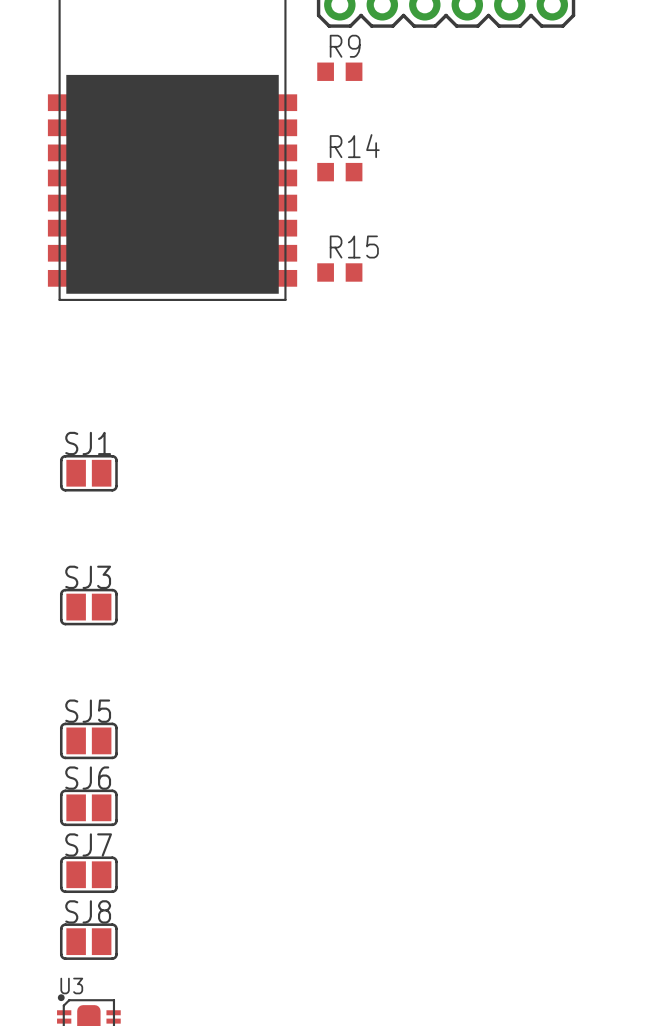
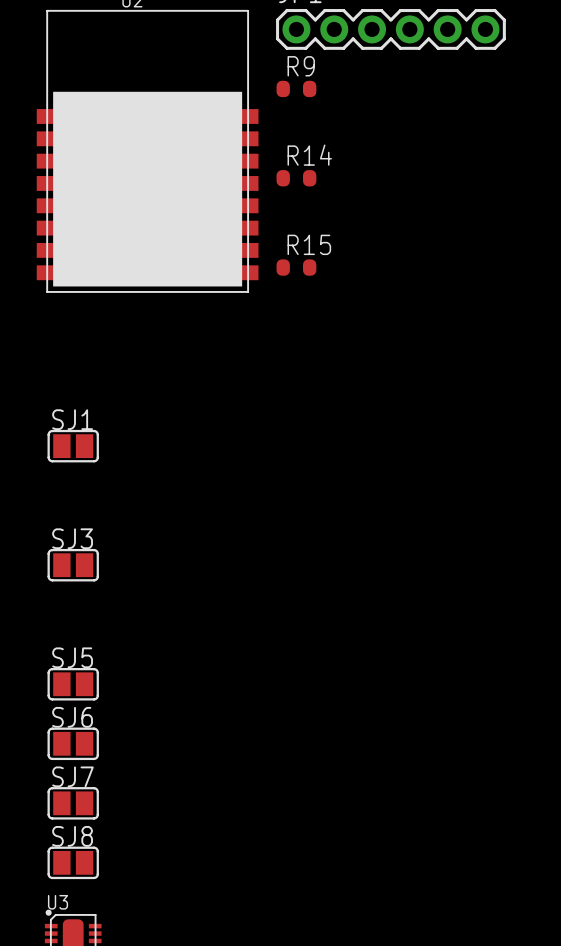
R9 footprint: [317, 62, 363, 81] -> [276, 80, 317, 98]
R14 footprint: [317, 162, 363, 182] -> [276, 170, 317, 187]
R15 footprint: [317, 263, 363, 282] -> [276, 259, 317, 276]

